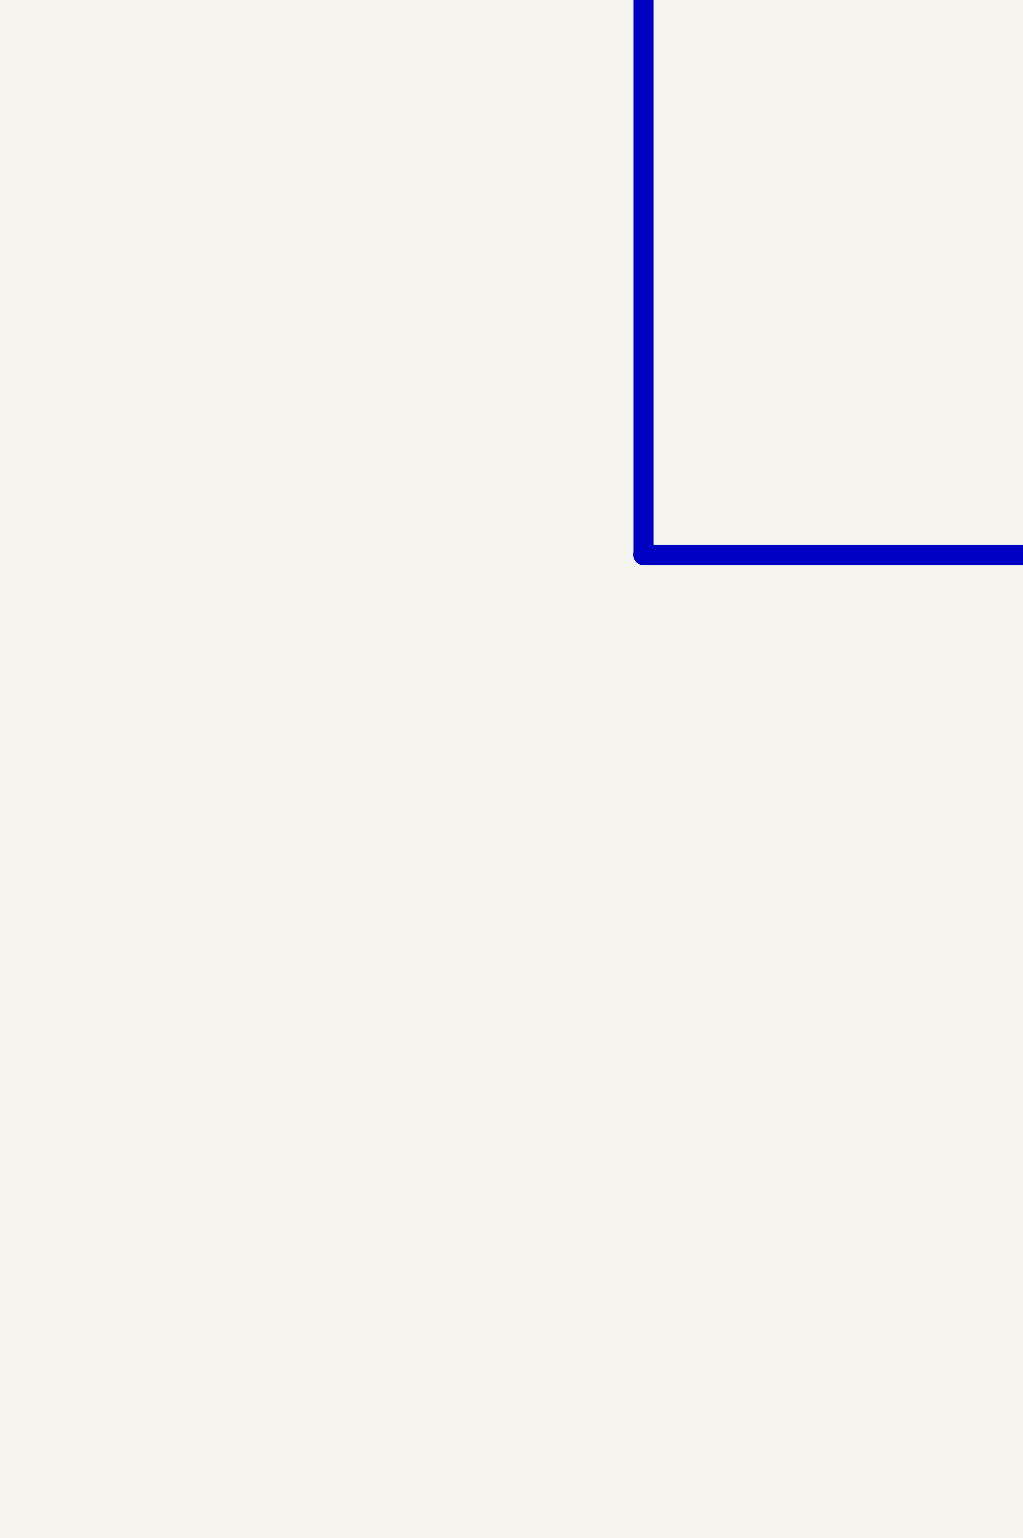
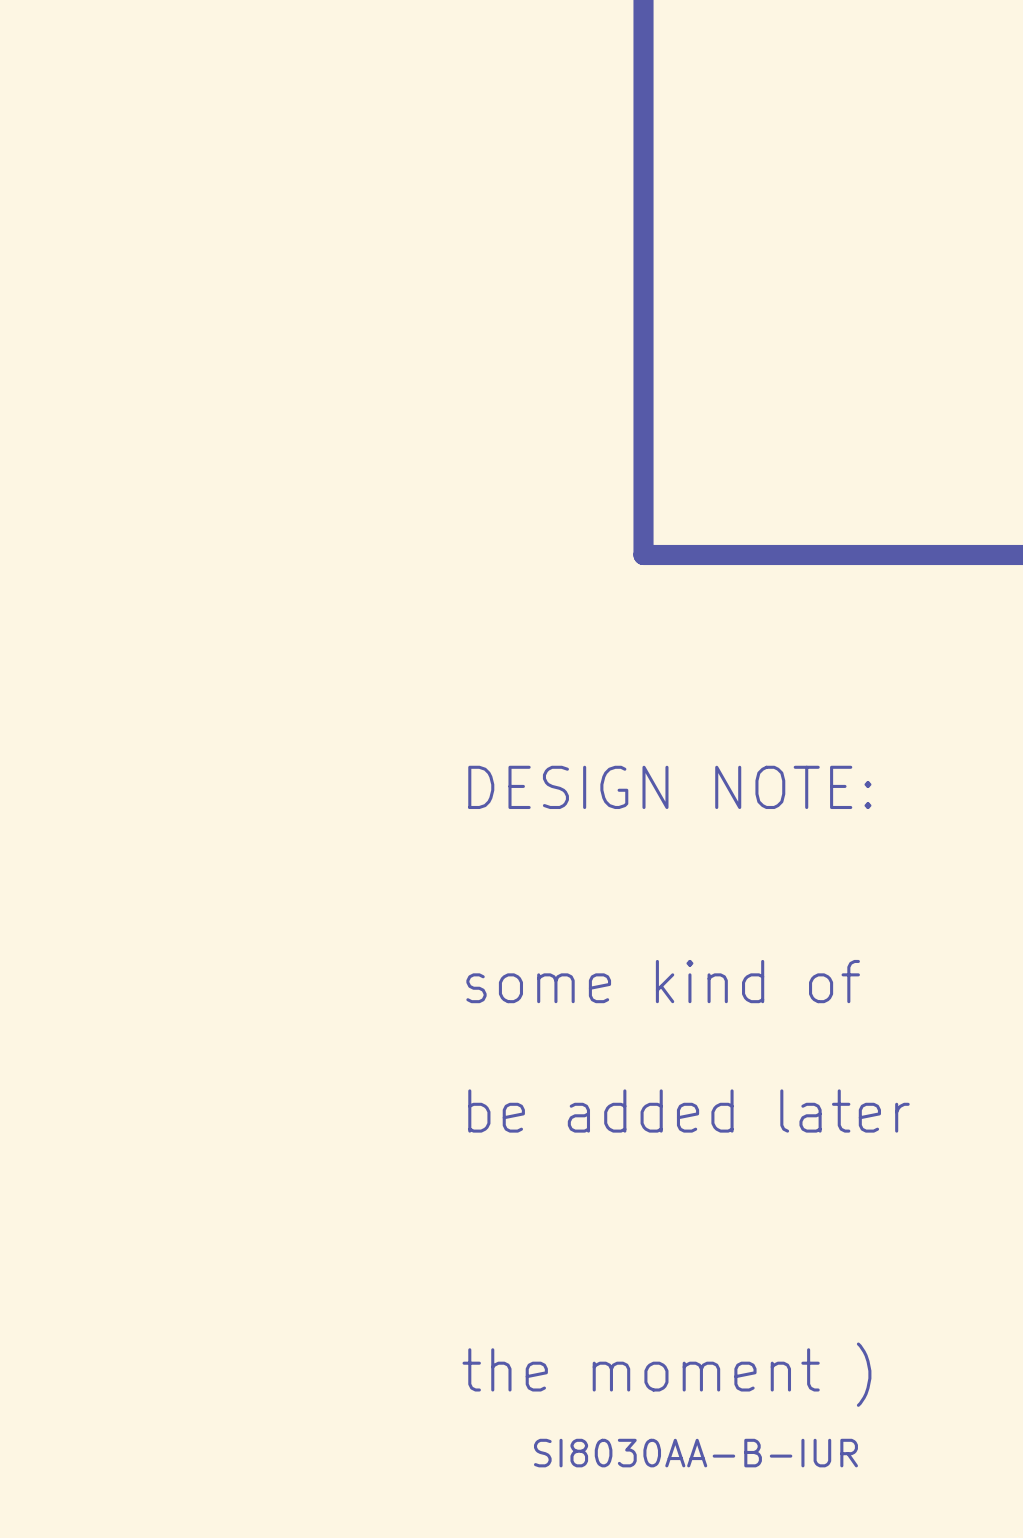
text: none -> DESIGN NOTE: (669, 787)
text: none -> some kind of (663, 981)
text: none -> be added later (688, 1111)
text: none -> the moment ) (666, 1374)
text: none -> SI8030AA-B-IUR (695, 1453)

